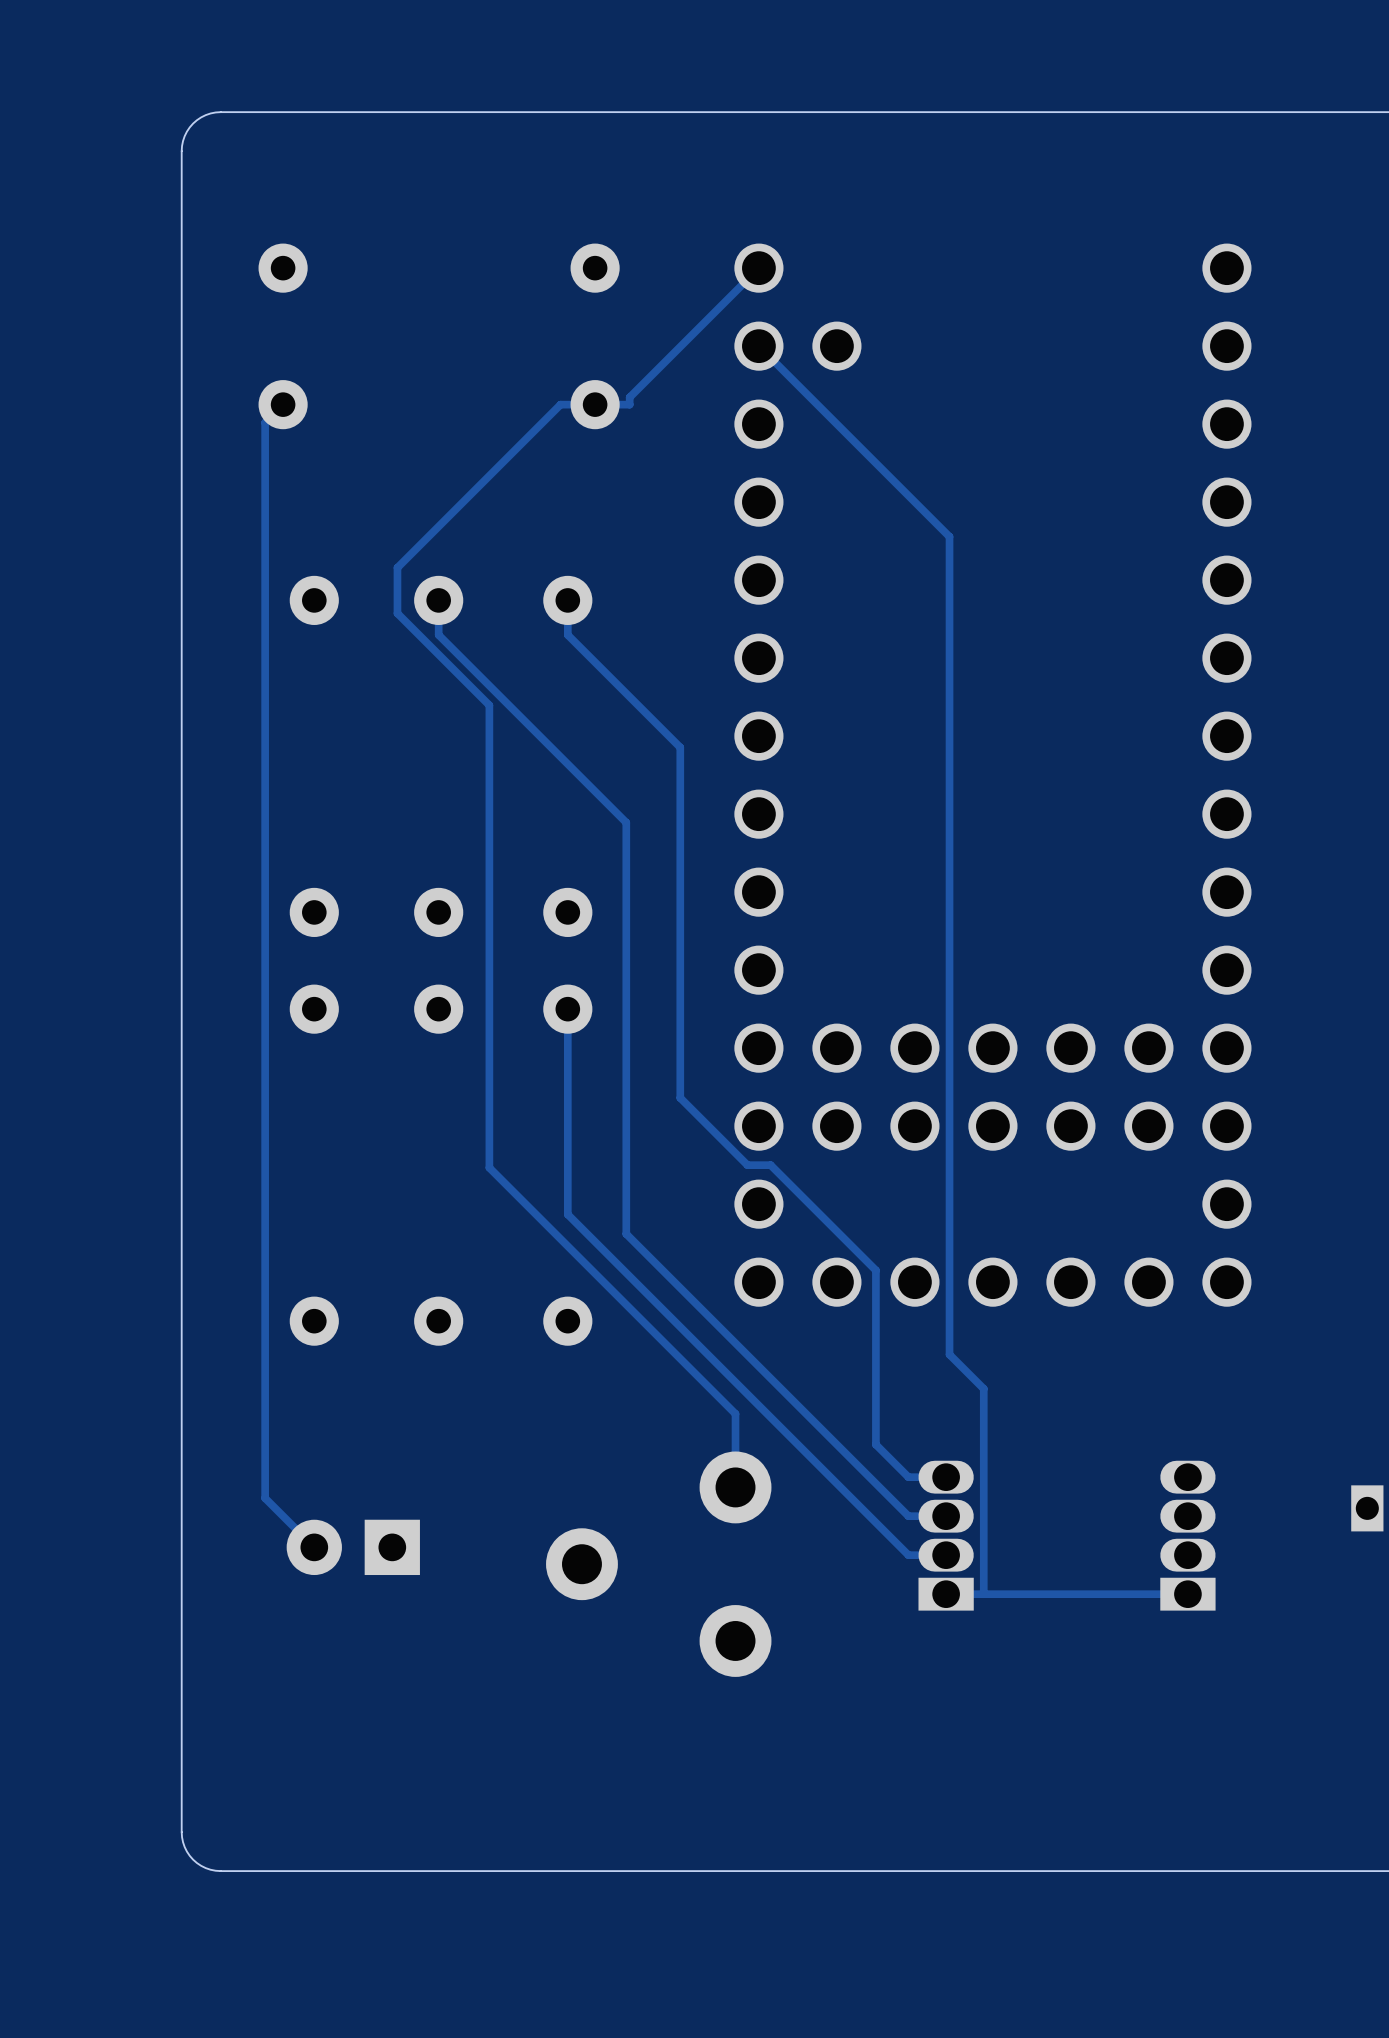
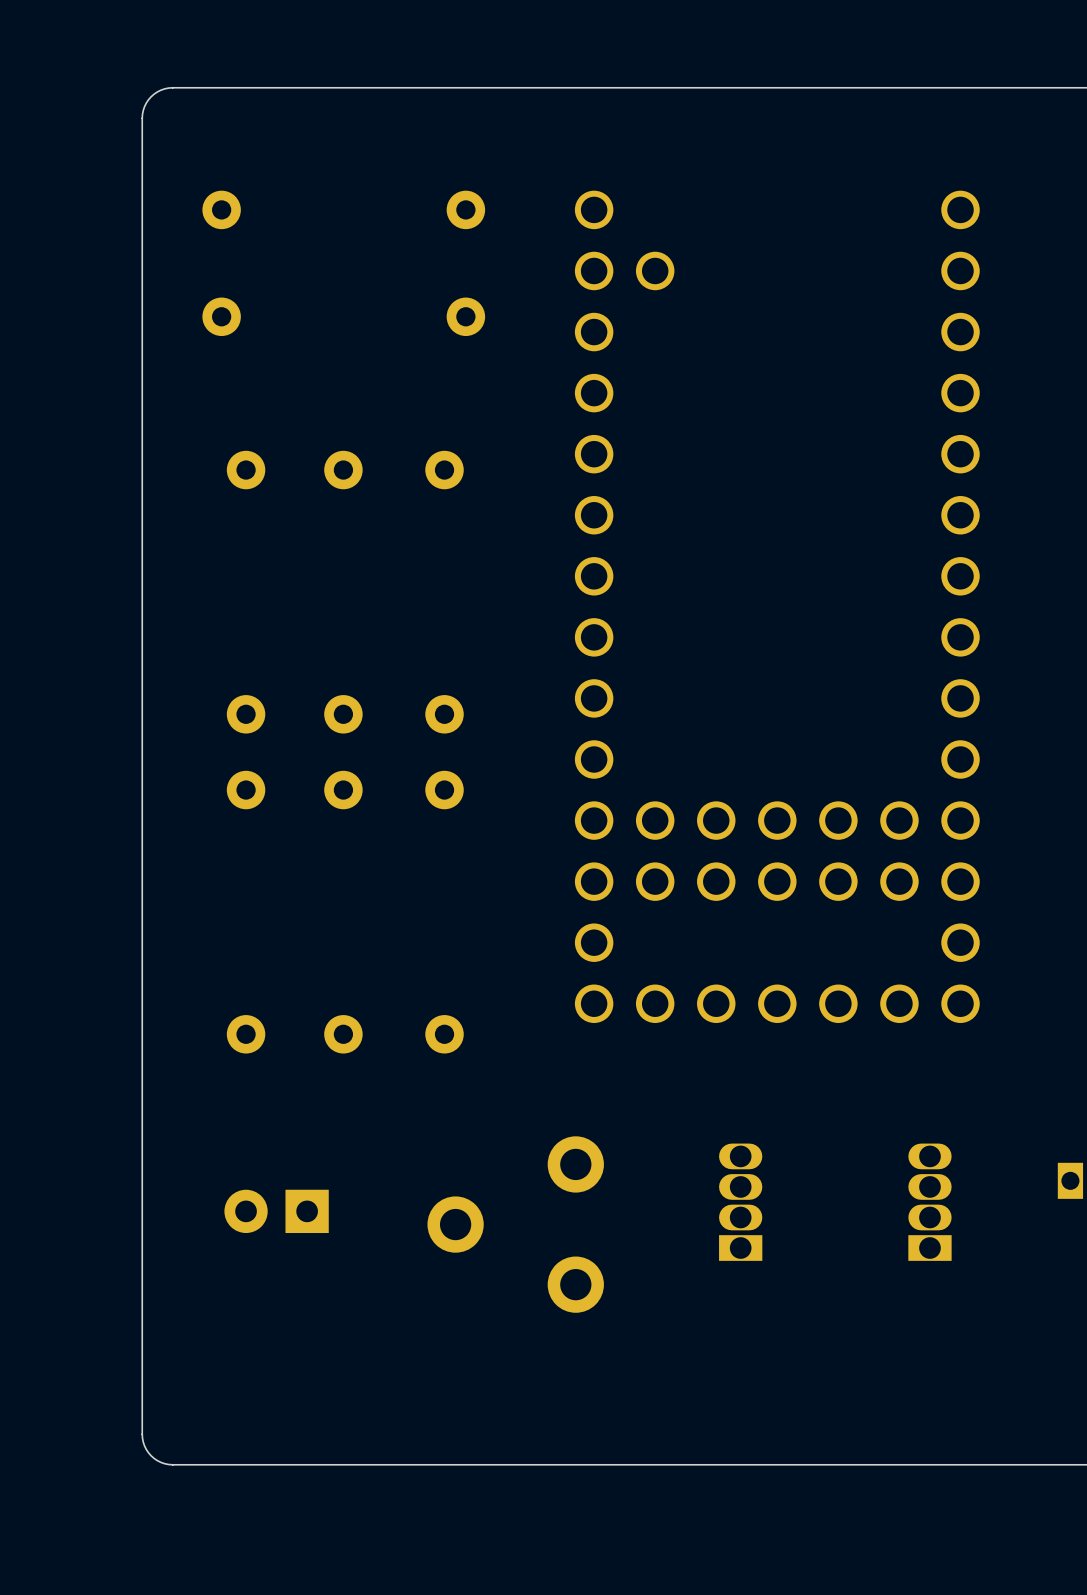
track: (758, 268) (629, 397) (629, 404) (560, 404) (397, 567) (397, 613) (489, 705) (489, 1167) (735, 1413) (735, 1487) -> none
track: (758, 346) (949, 536) (949, 1354) (983, 1388) (983, 1594) -> none
track: (283, 404) (265, 422) (265, 1498) (314, 1547) -> none
track: (438, 600) (438, 635) (626, 822) (626, 1233) (908, 1516) (946, 1516) -> none
track: (567, 600) (567, 635) (680, 747) (680, 1097) (747, 1165) (770, 1165) (875, 1270) (875, 1444) (908, 1477) (946, 1477) -> none
track: (567, 1009) (567, 1214) (908, 1555) (946, 1555) -> none
track: (1187, 1594) (946, 1594) -> none

